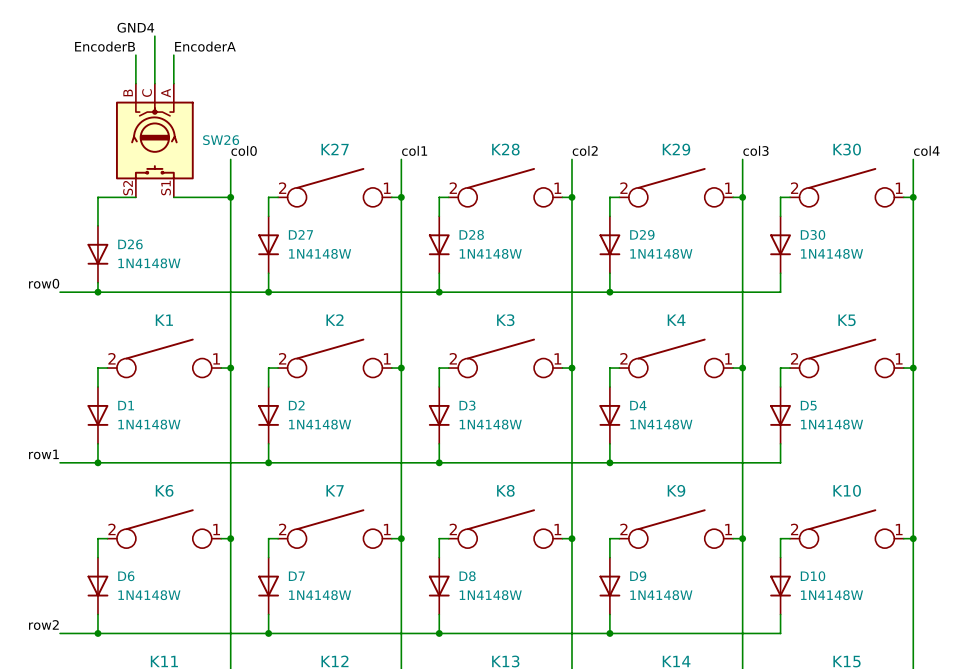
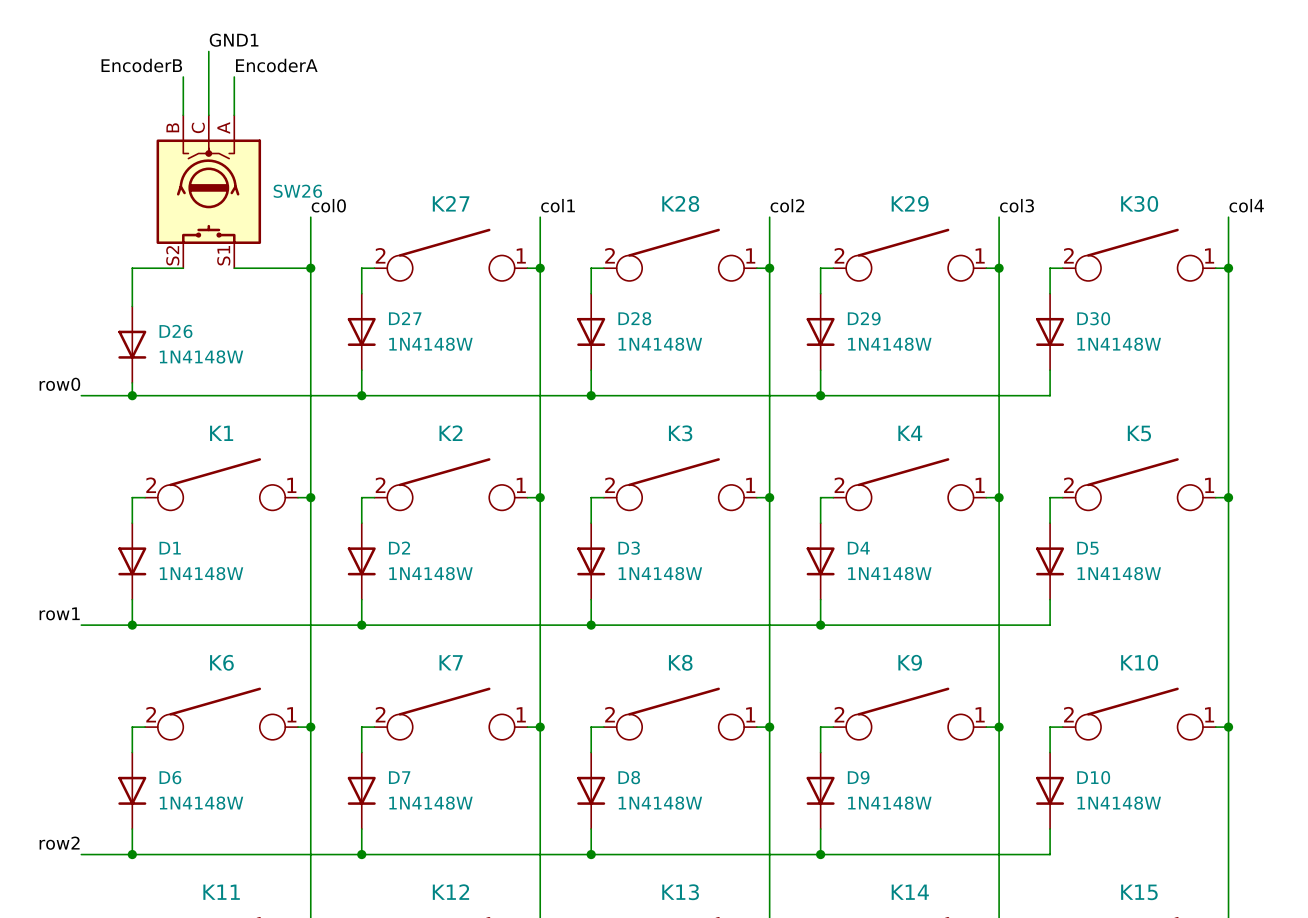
label: GND4 (135, 27) -> GND1 (234, 40)

